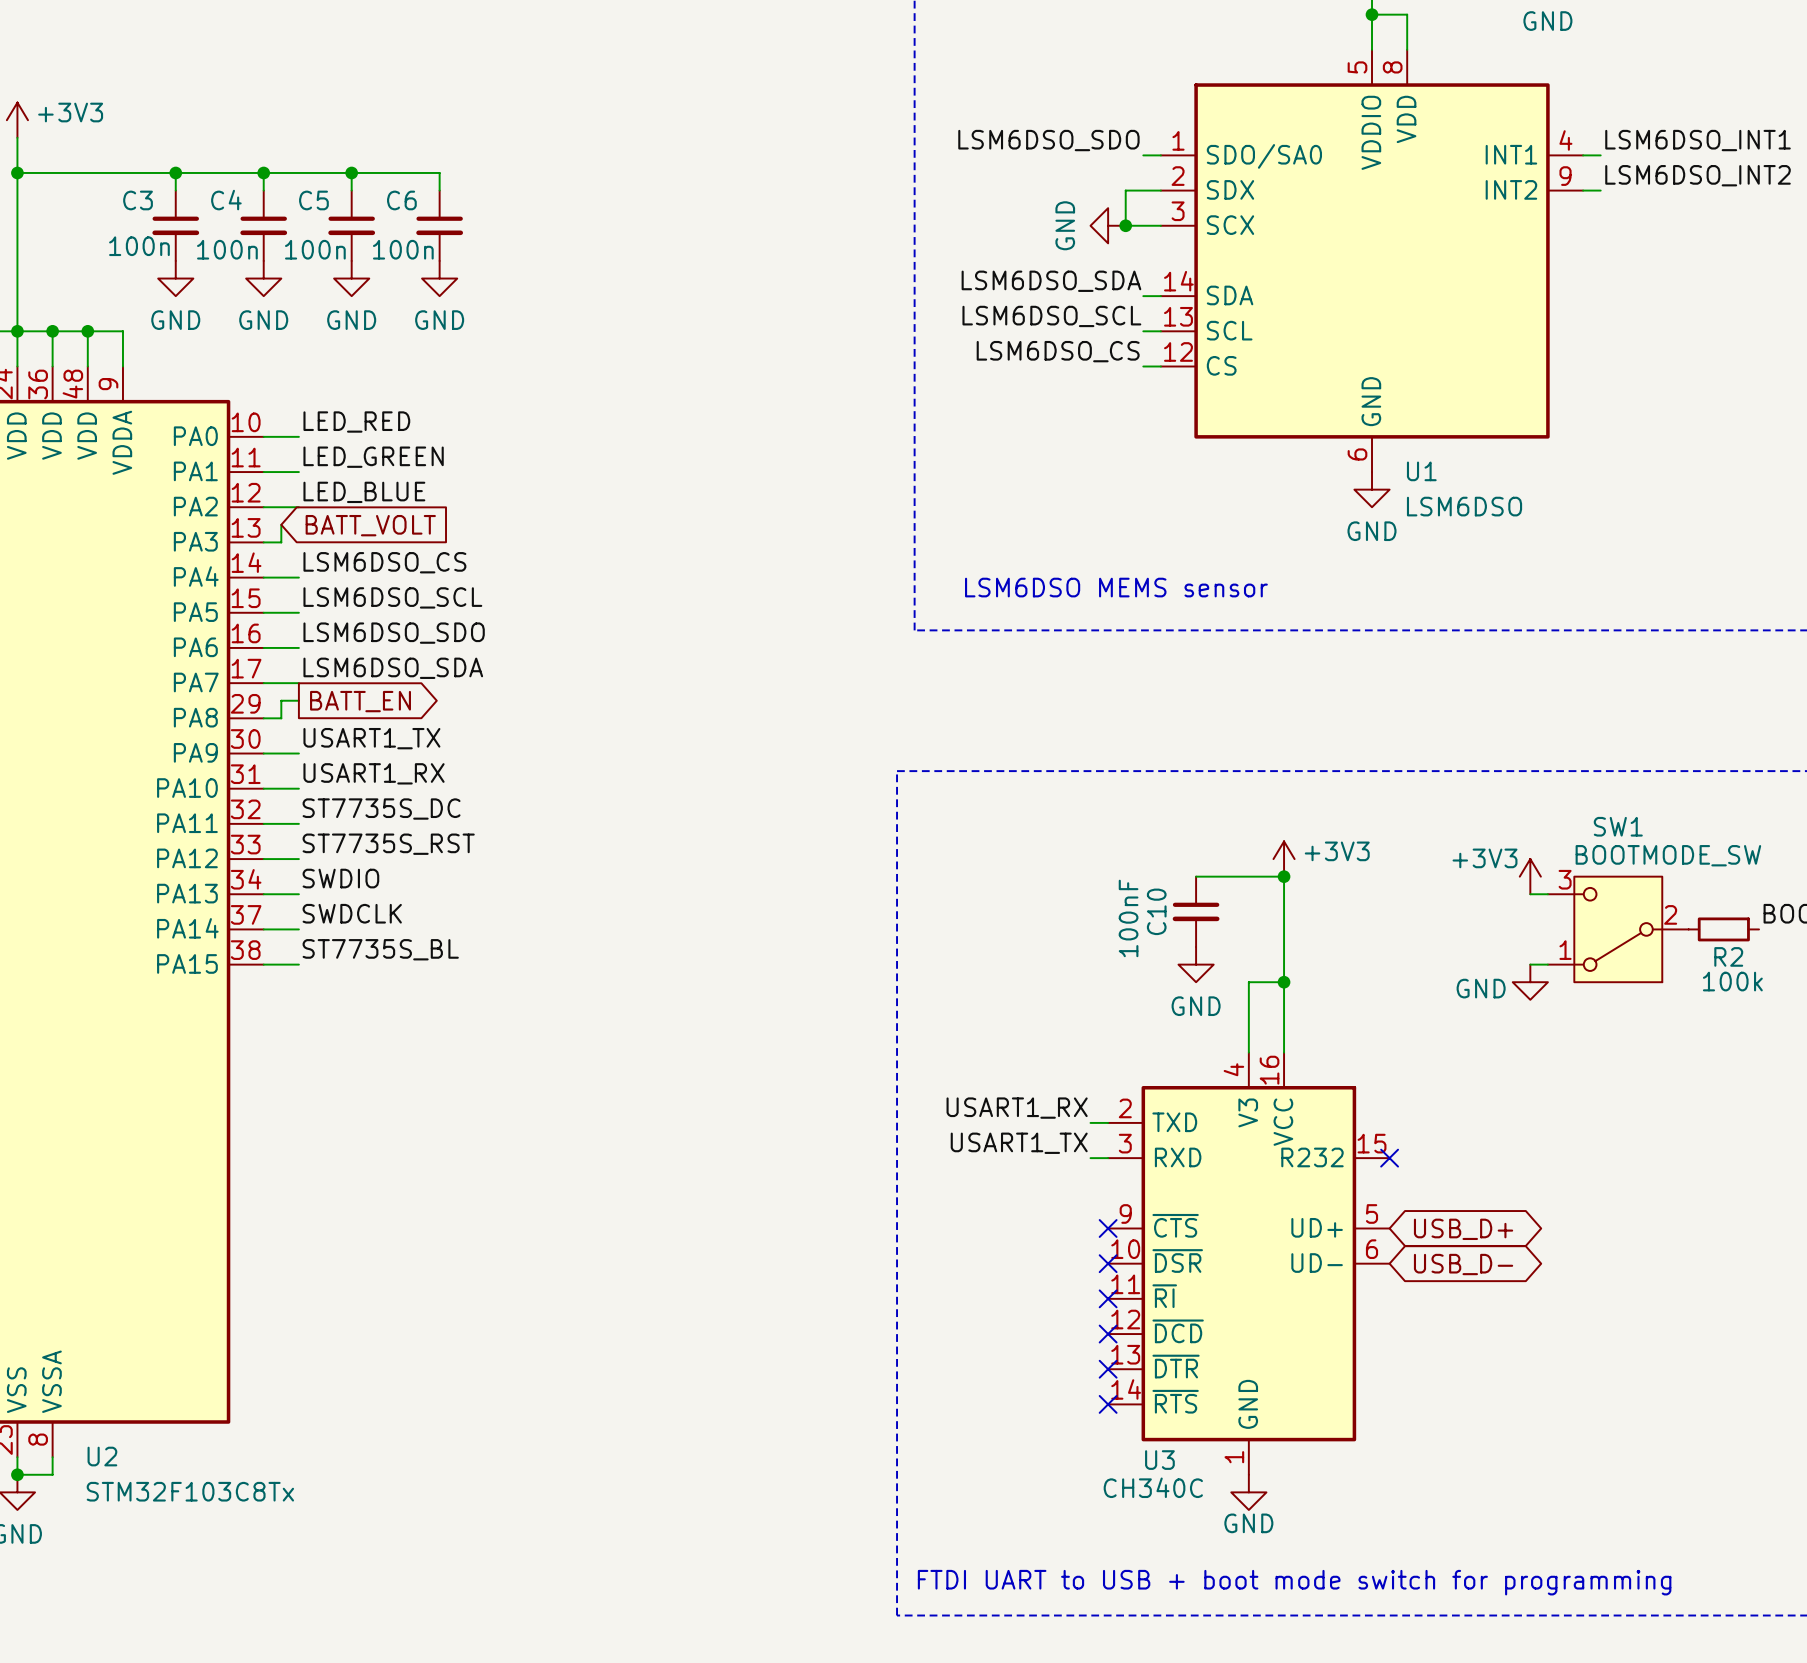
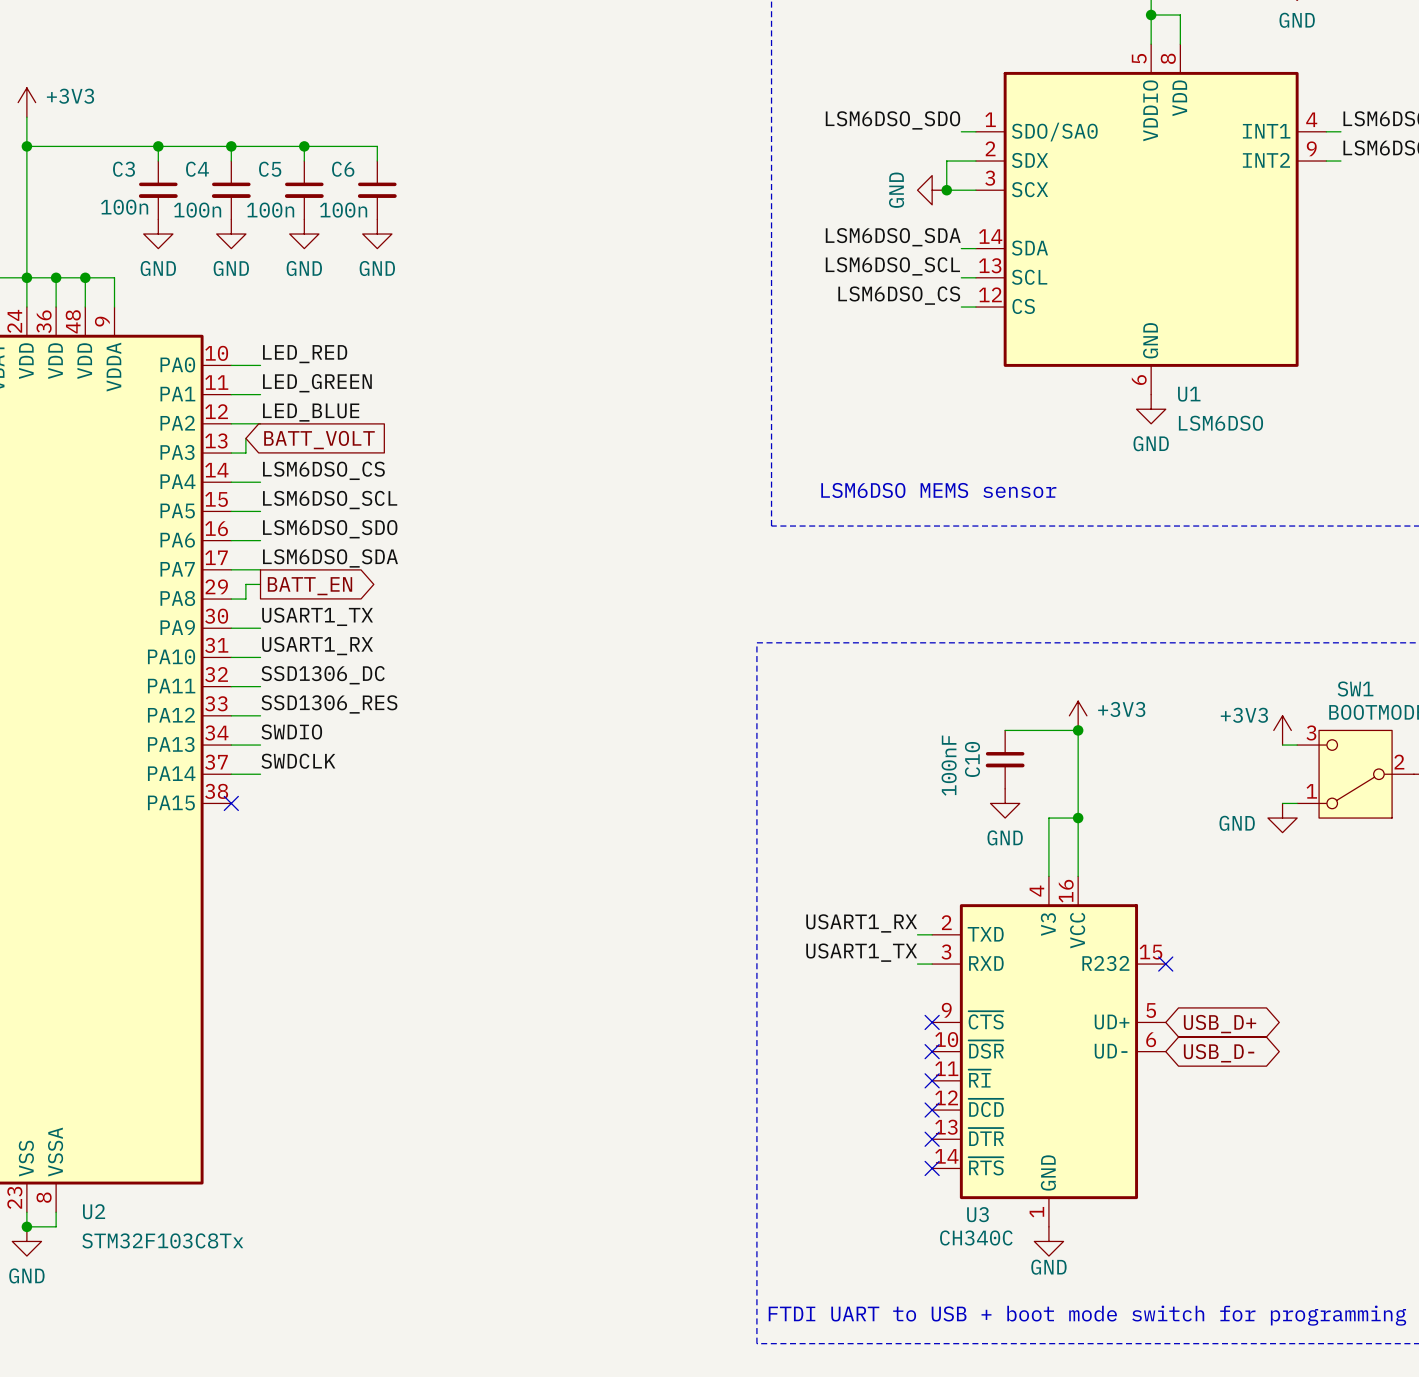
label: ST7735S_DC (381, 809) -> SSD1306_DC (323, 675)
label: ST7735S_RST (388, 844) -> SSD1306_RES (329, 704)
label: ST7735S_BL (380, 949) -> none
wire: (263, 964) (298, 964) -> none
no-connect mark: none -> (231, 803)

